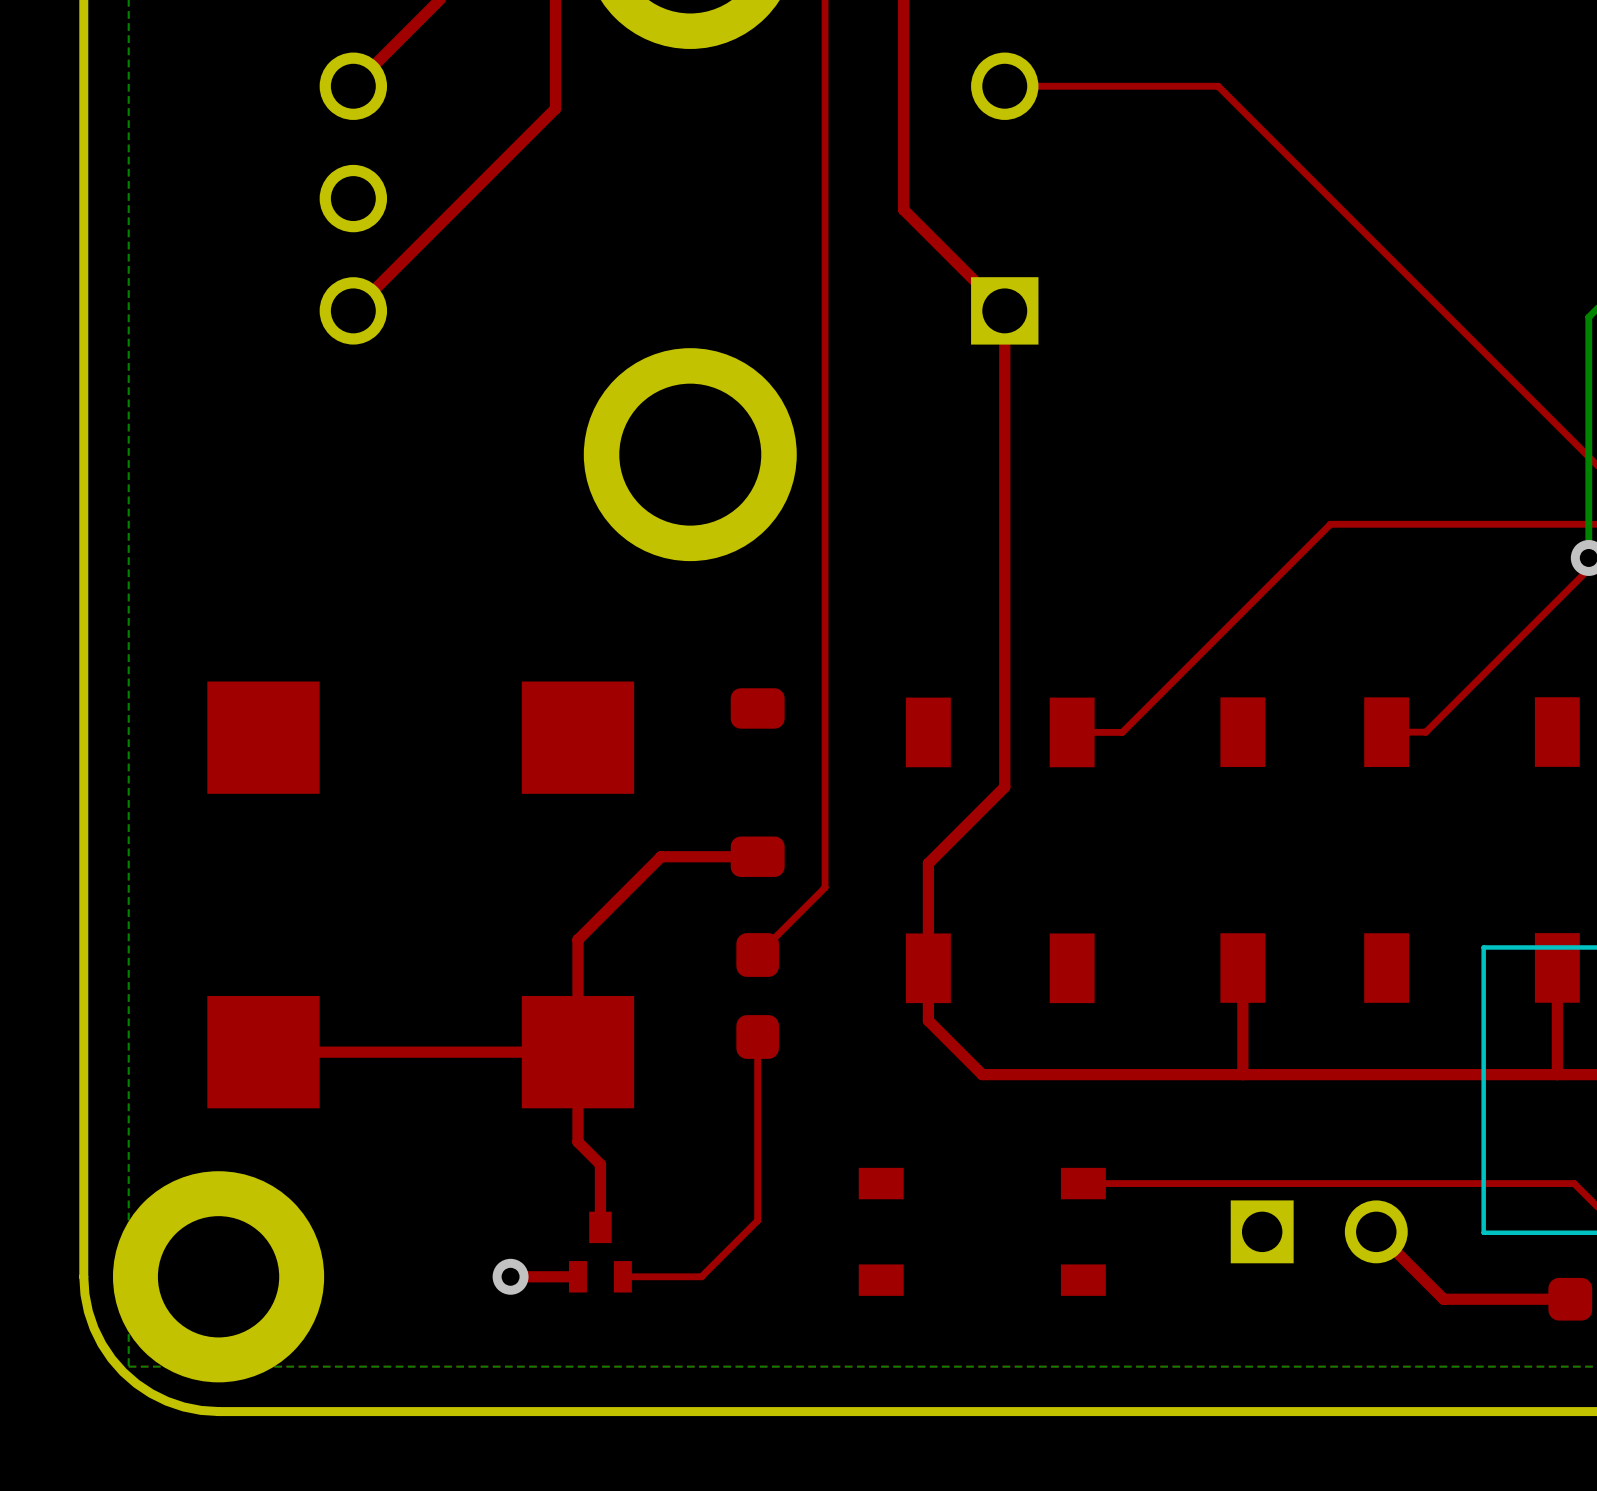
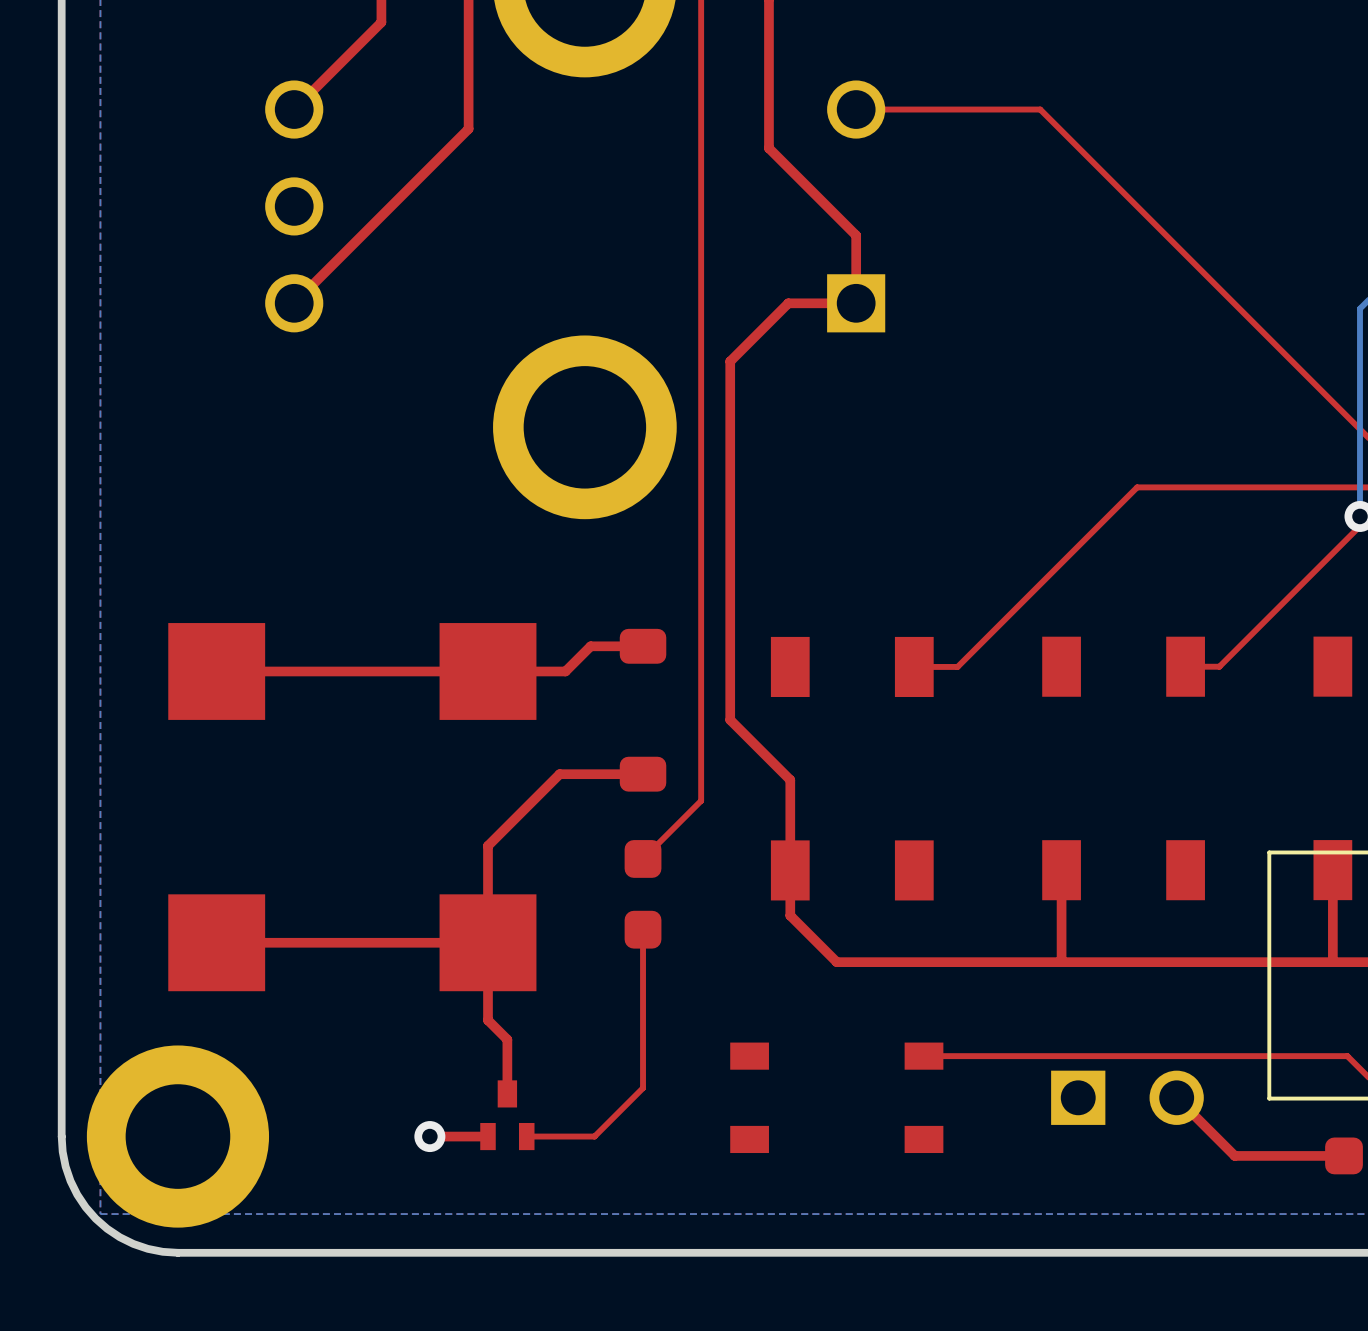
top track: (903, 131) (903, 209) (1004, 310) (1004, 787) (928, 863) -> (768, 148) (856, 235) (856, 303) (788, 303) (730, 361) (730, 719) (790, 780)
top track: none -> (643, 646) (590, 646) (565, 671) (216, 671)

